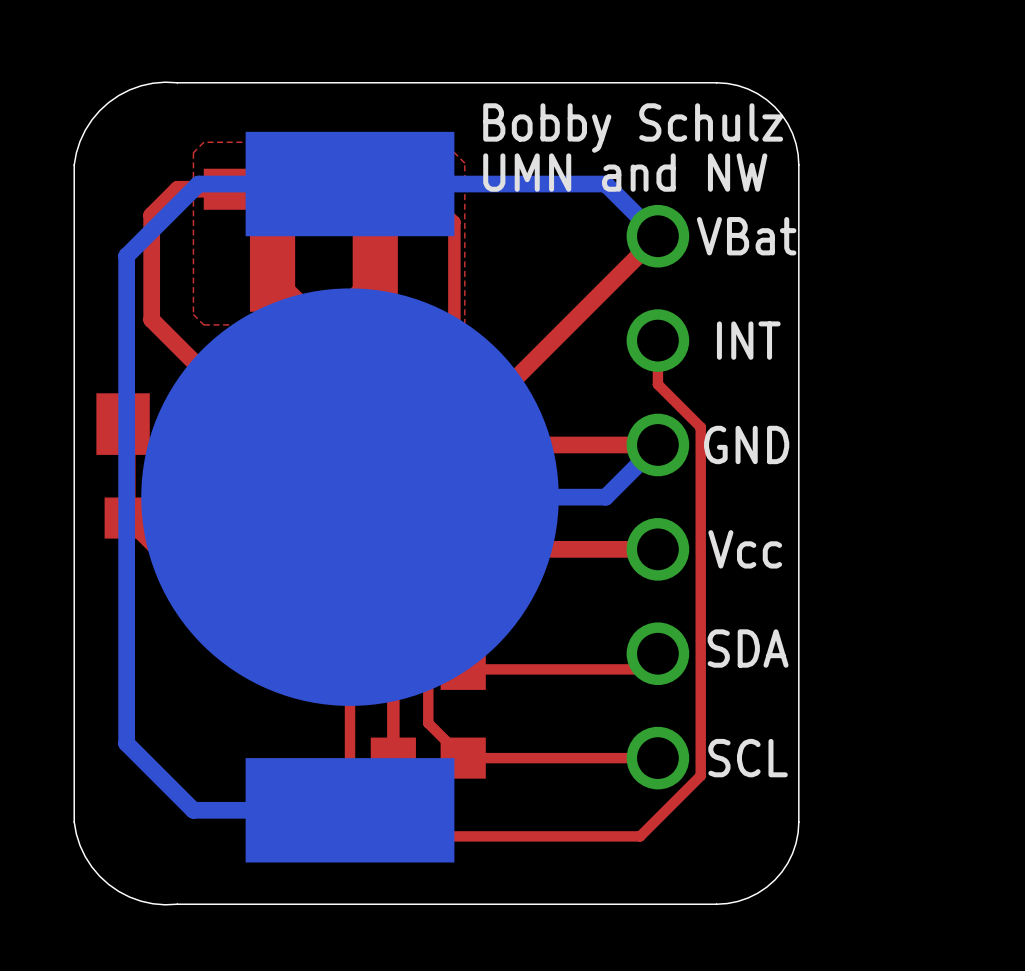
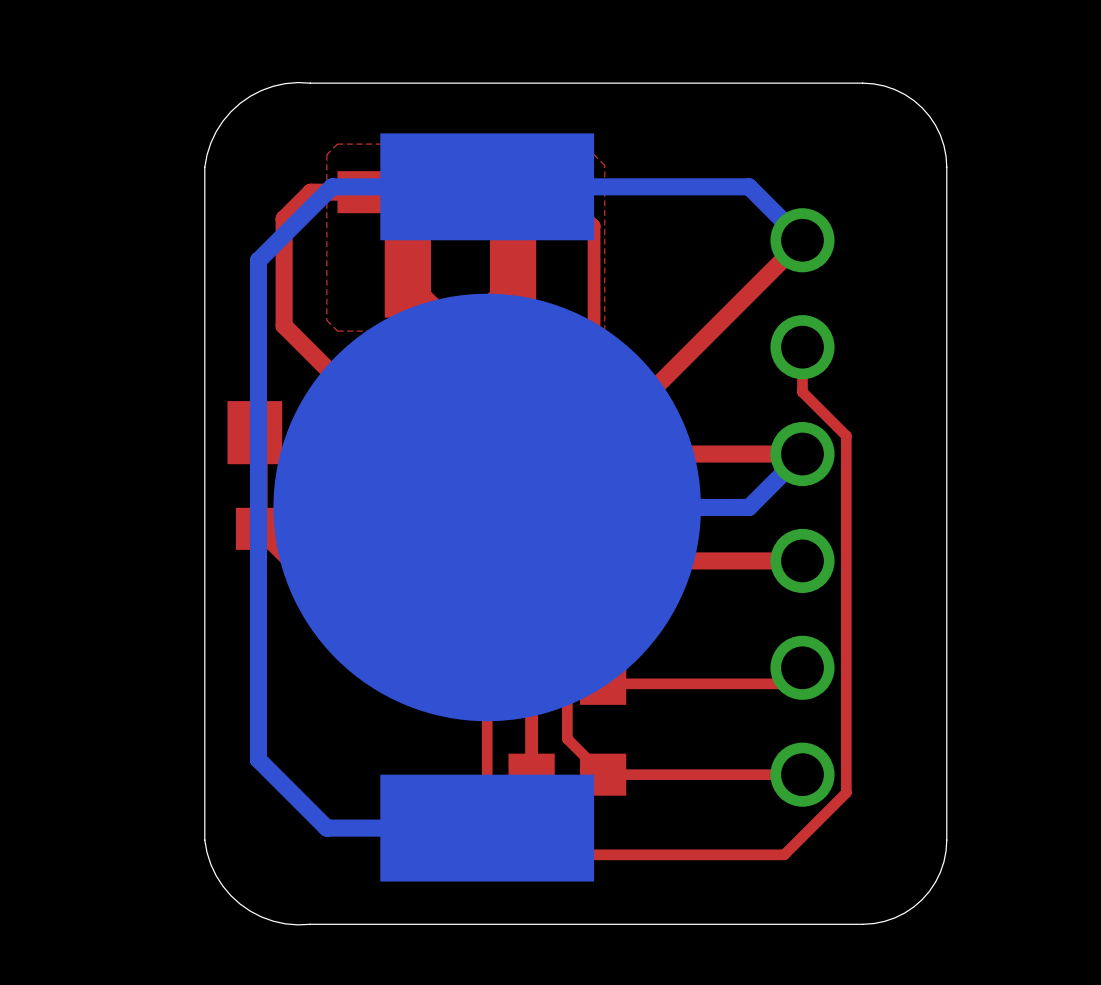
text: Bobby Schulz (633, 128) -> none
text: UMN and NW (625, 172) -> none
text: VBat (746, 236) -> none
text: INT (748, 340) -> none
text: GND (746, 444) -> none
text: Vcc (745, 549) -> none
text: SDA (748, 648) -> none
text: SCL (748, 758) -> none

